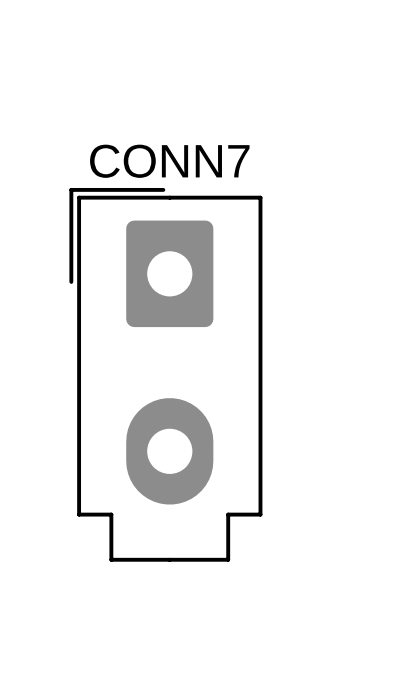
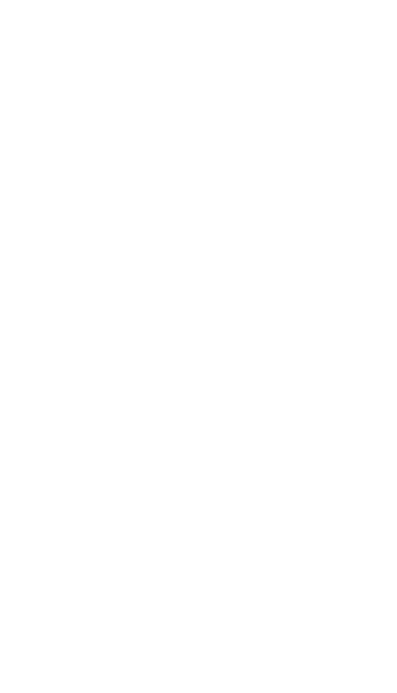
CONN7: (165, 374) -> none

